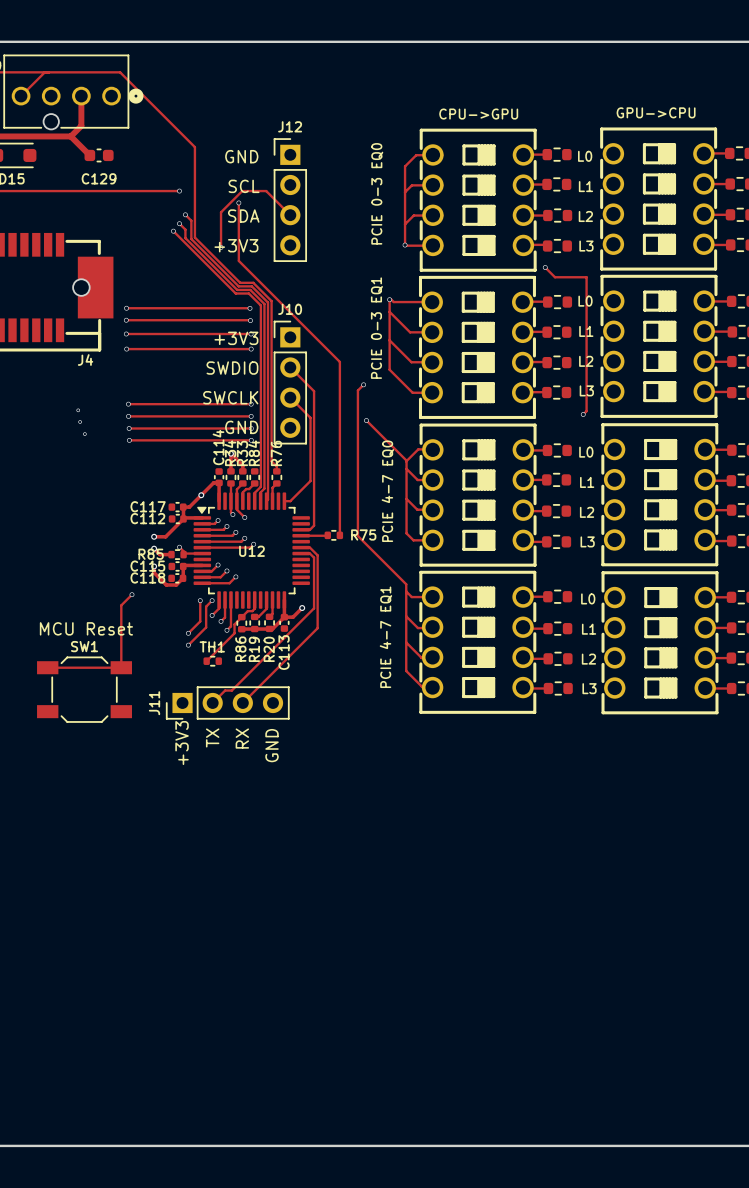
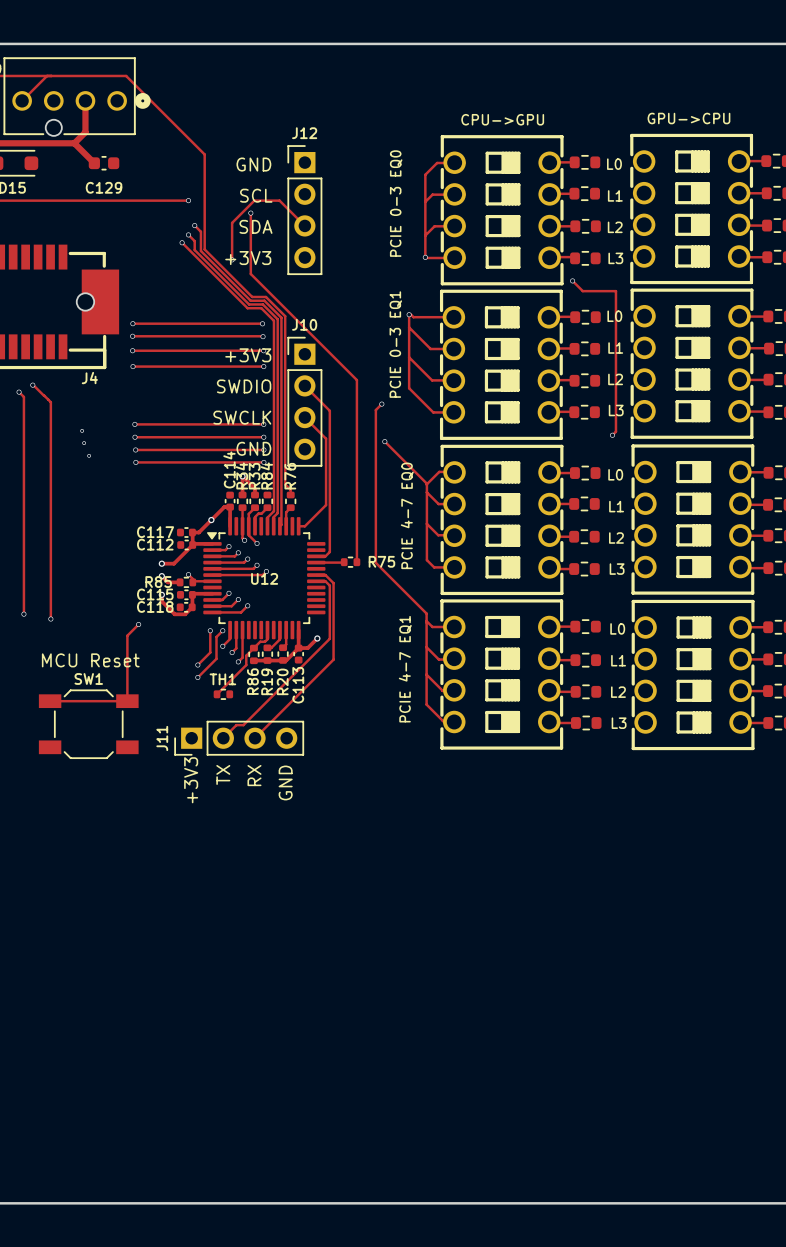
track: none -> (32, 385) (50, 402) (50, 619)
via: none -> (32, 385)
track: none -> (19, 392) (23, 396) (23, 614)
via: none -> (19, 392)
via: none -> (23, 614)
via: none -> (50, 619)

